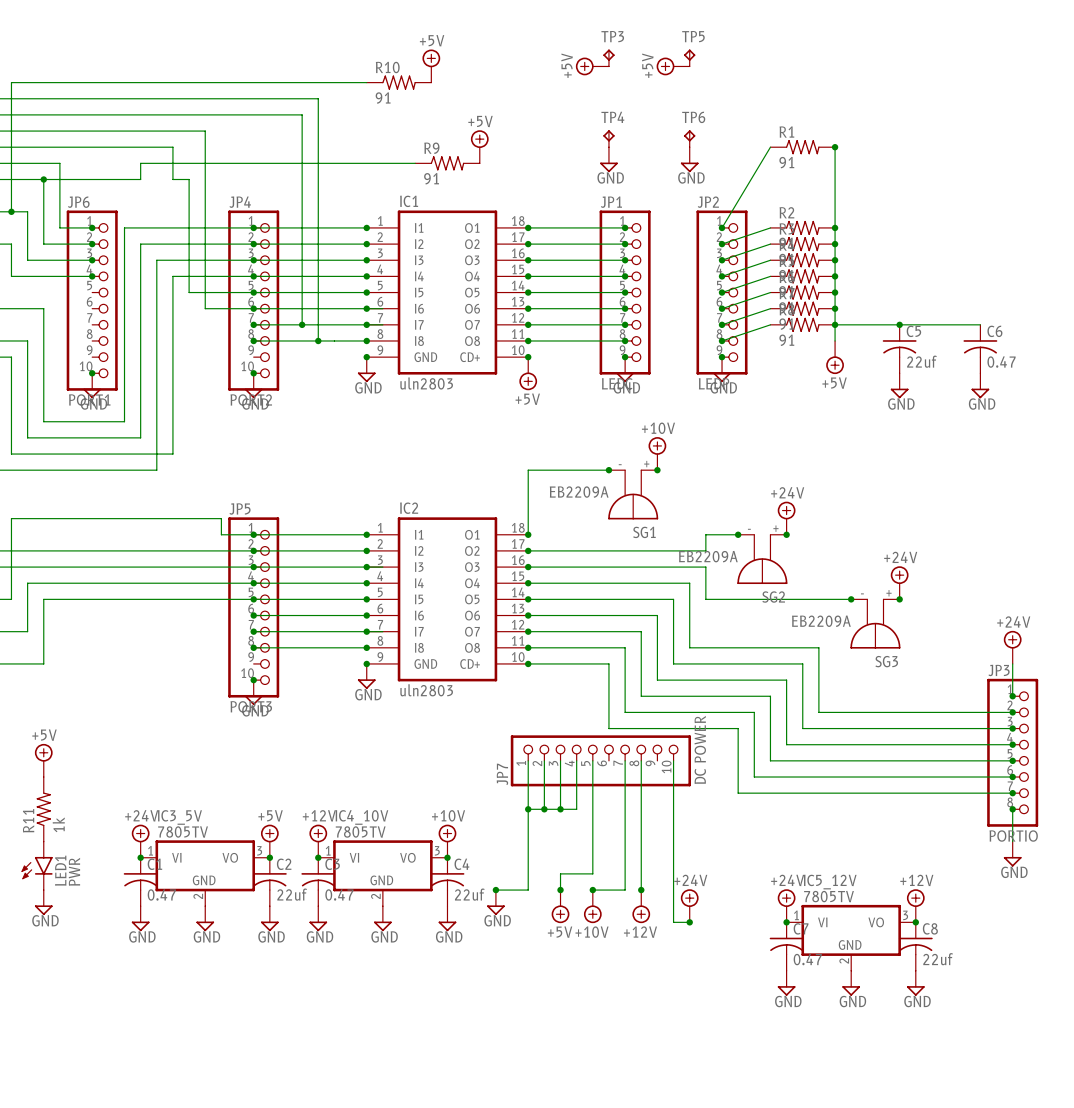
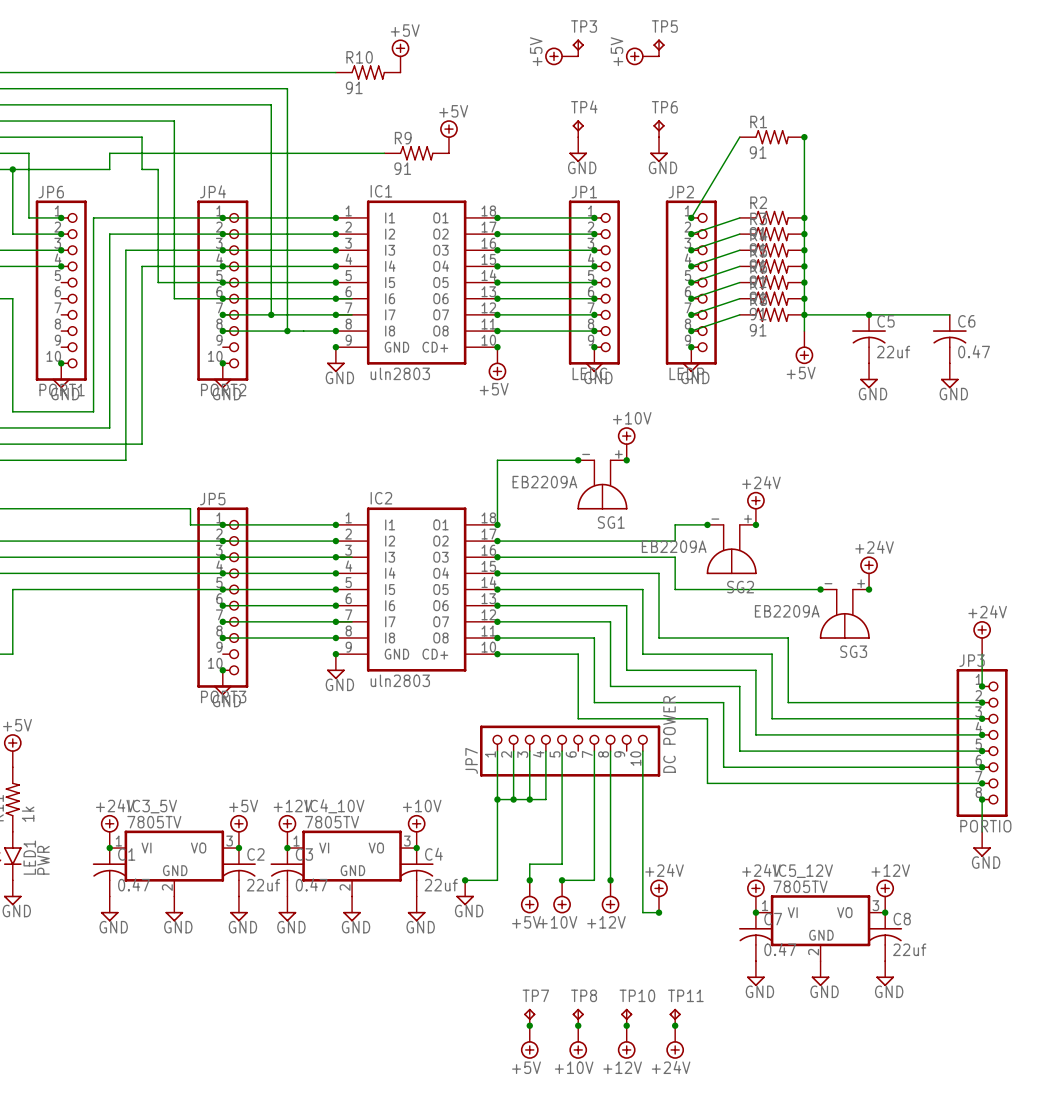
TP7: none -> (529, 1017)
TP8: none -> (578, 1017)
TP10: none -> (626, 1017)
TP11: none -> (675, 1017)
junction: none -> (529, 1025)
junction: none -> (578, 1025)
junction: none -> (626, 1025)
junction: none -> (675, 1025)
power symbol: none -> +5V (529, 1042)
power symbol: none -> +10V (578, 1042)
power symbol: none -> +12V (626, 1042)
power symbol: none -> +24V (675, 1042)

